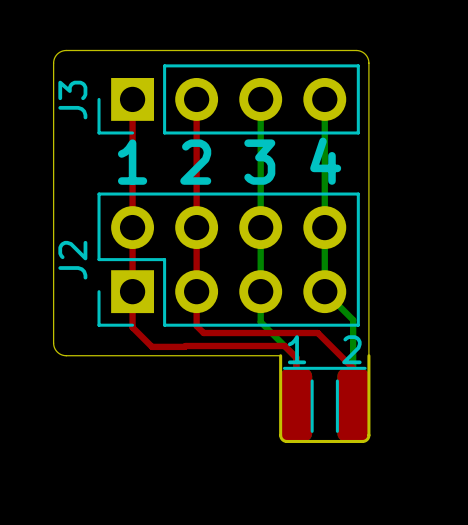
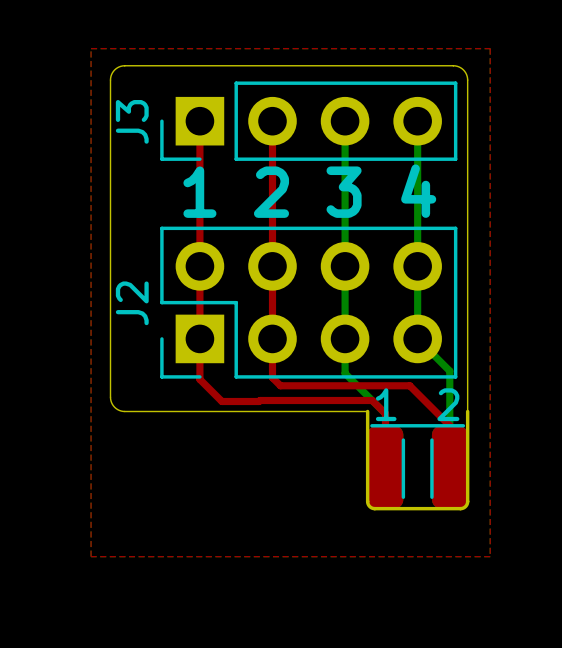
top zone outline: none -> (91, 48) (91, 556) (490, 556) (490, 48) (91, 48)

